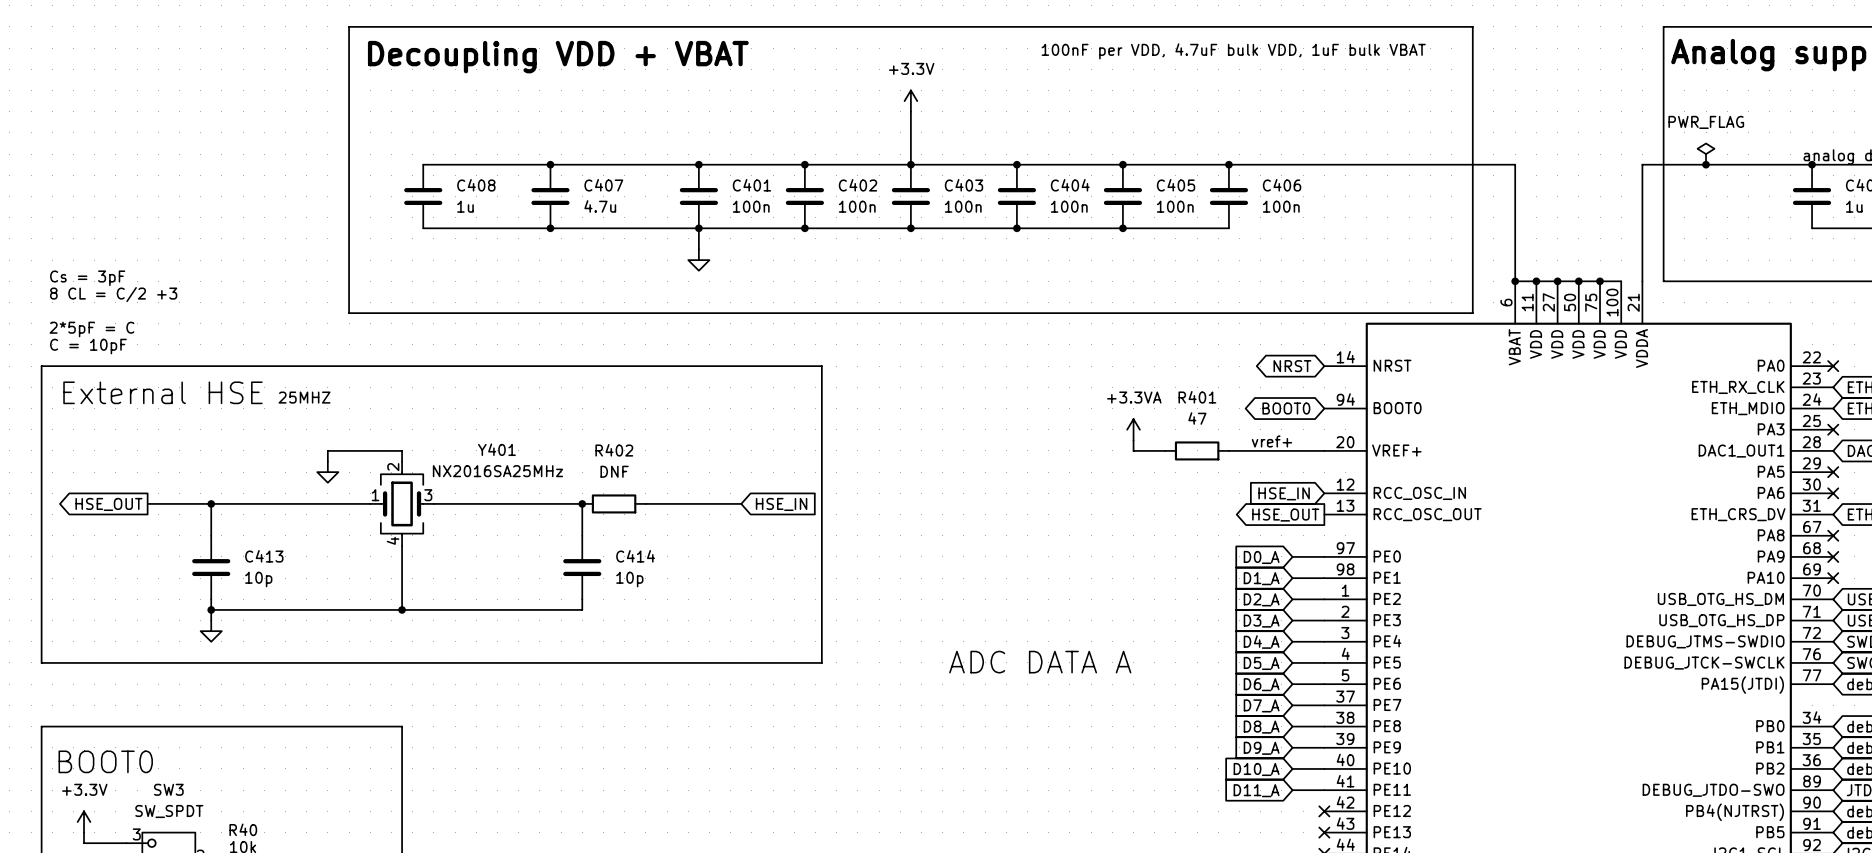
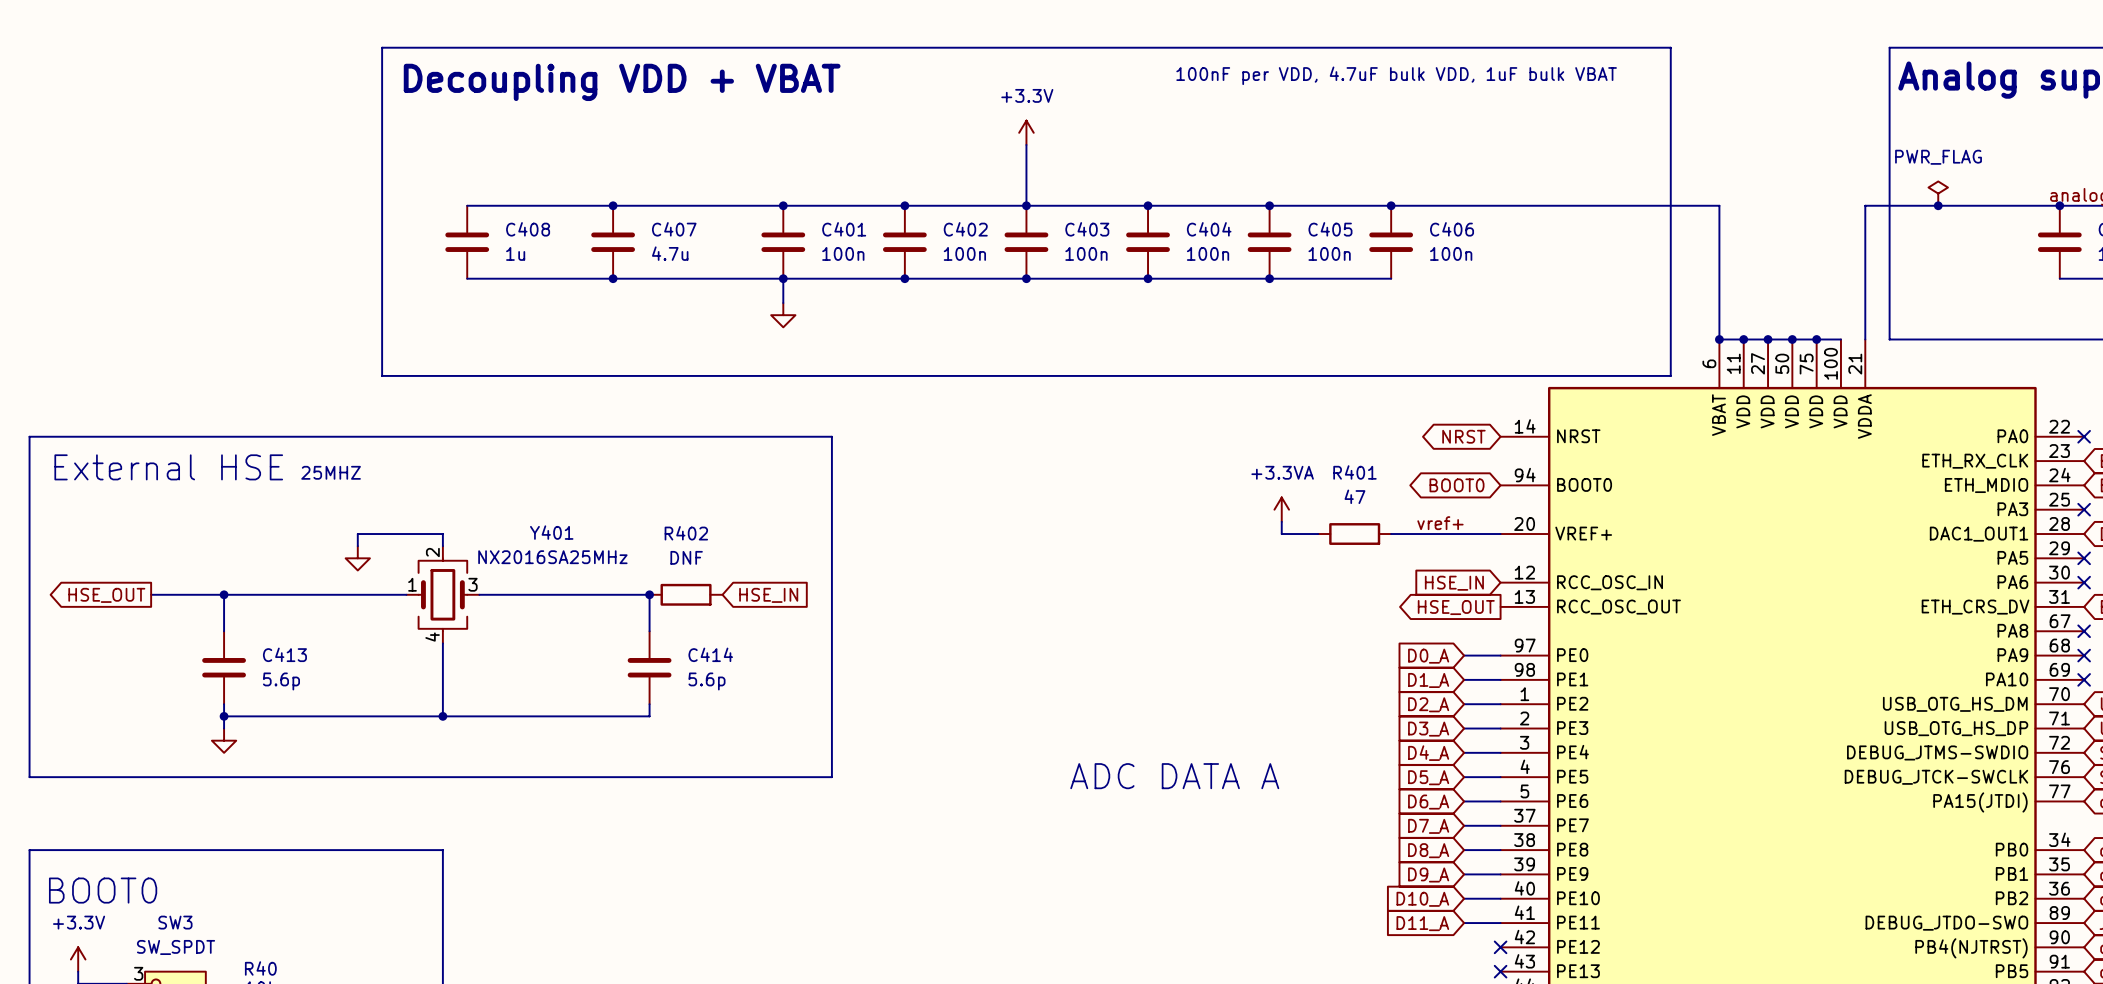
text: Cs = 3pF (87, 278) -> none
text: 8 CL = C/2 +3 (113, 294) -> none
text: 2*5pF = C (91, 329) -> none
text: C = 10pF (88, 346) -> none
line: (741, 366) (821, 366) (821, 662) (741, 662) -> (831, 436) (831, 777)
wire: (645, 503) (741, 503) -> none
global label position: HSE_IN (781, 504) -> HSE_IN (768, 595)
C413 value: 10p (258, 579) -> 5.6p (281, 681)
C414 value: 10p (629, 579) -> 5.6p (706, 681)

